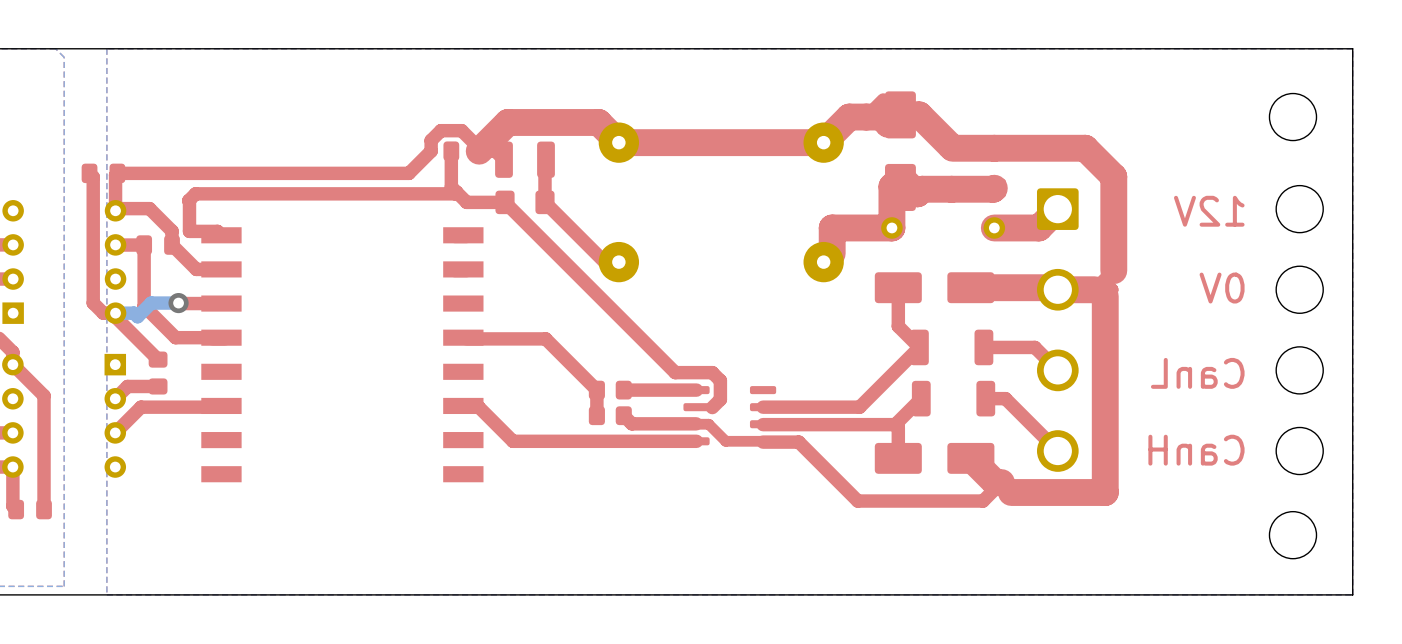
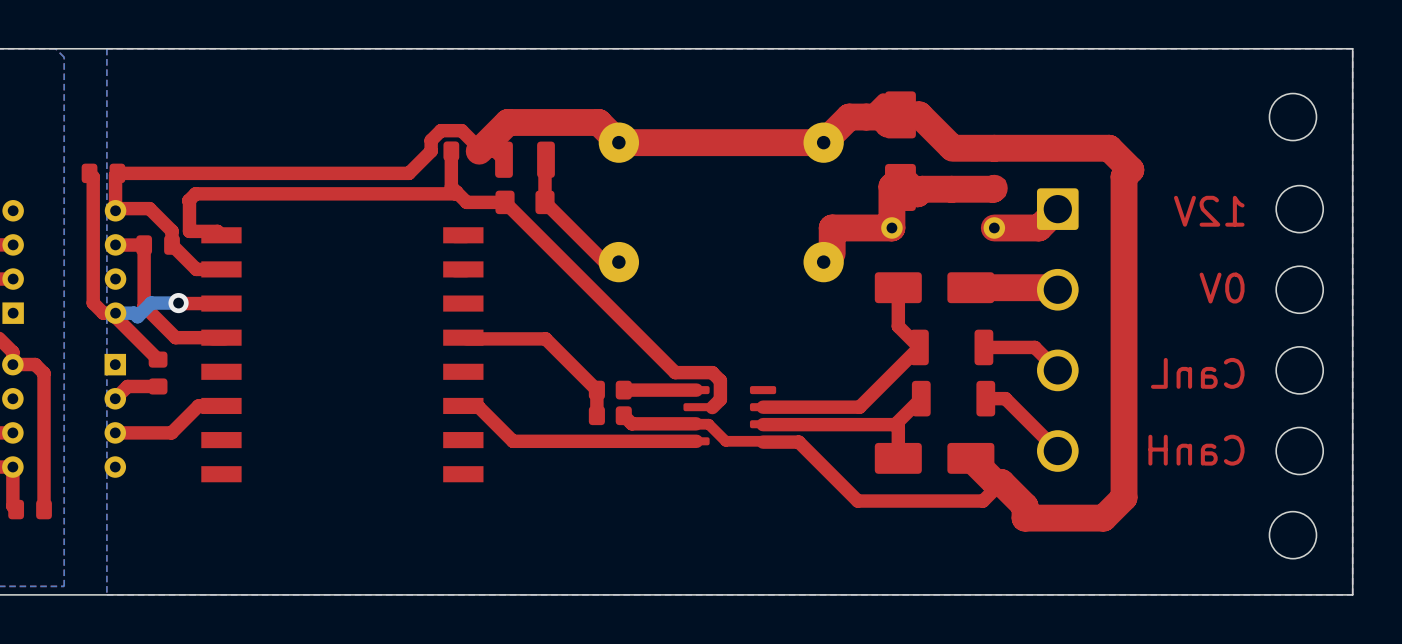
top track: (1085, 148) (1113, 176) (1113, 270) (1094, 289) (1057, 289) (1111, 289) (1105, 296) (1105, 492) (1011, 492) -> (1085, 148) (1109, 148) (1130, 169) (1124, 176) (1124, 497) (1103, 518) (1025, 518) (1025, 506) (1001, 482)
top track: (12, 364) (44, 395) -> (19, 364) (35, 364) (44, 373) (44, 395)
top track: (224, 407) (141, 407) (115, 432) -> (221, 405) (198, 405) (171, 432) (115, 432)

